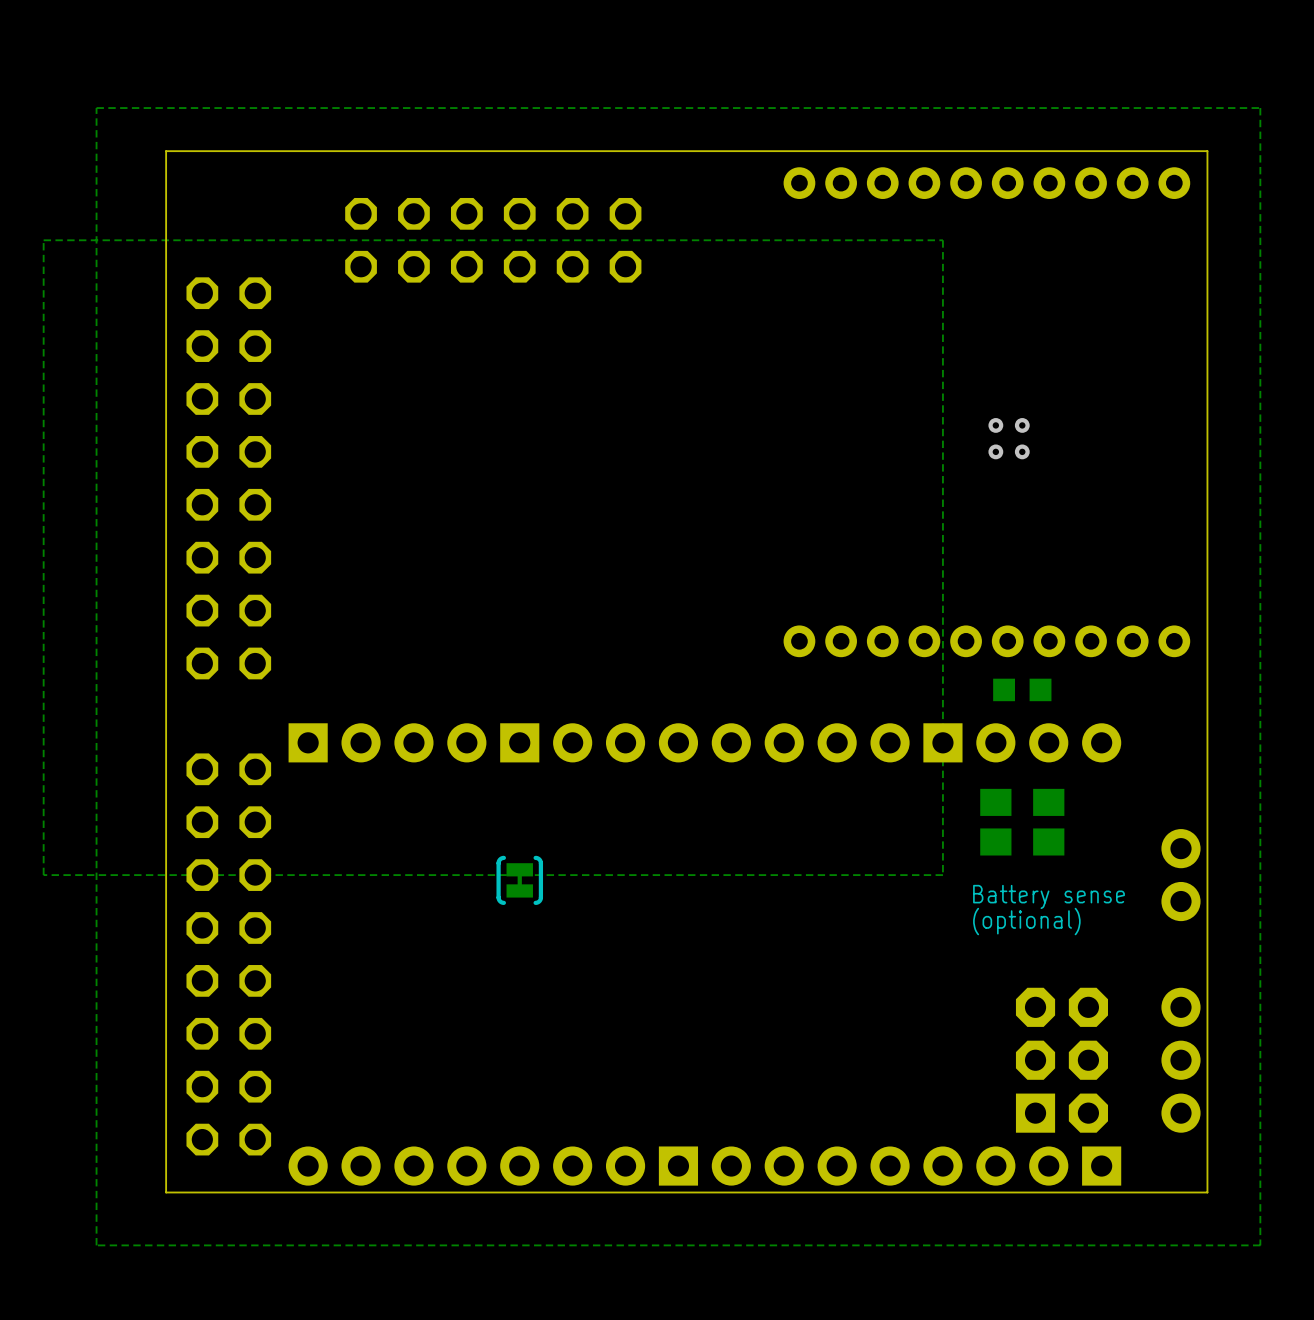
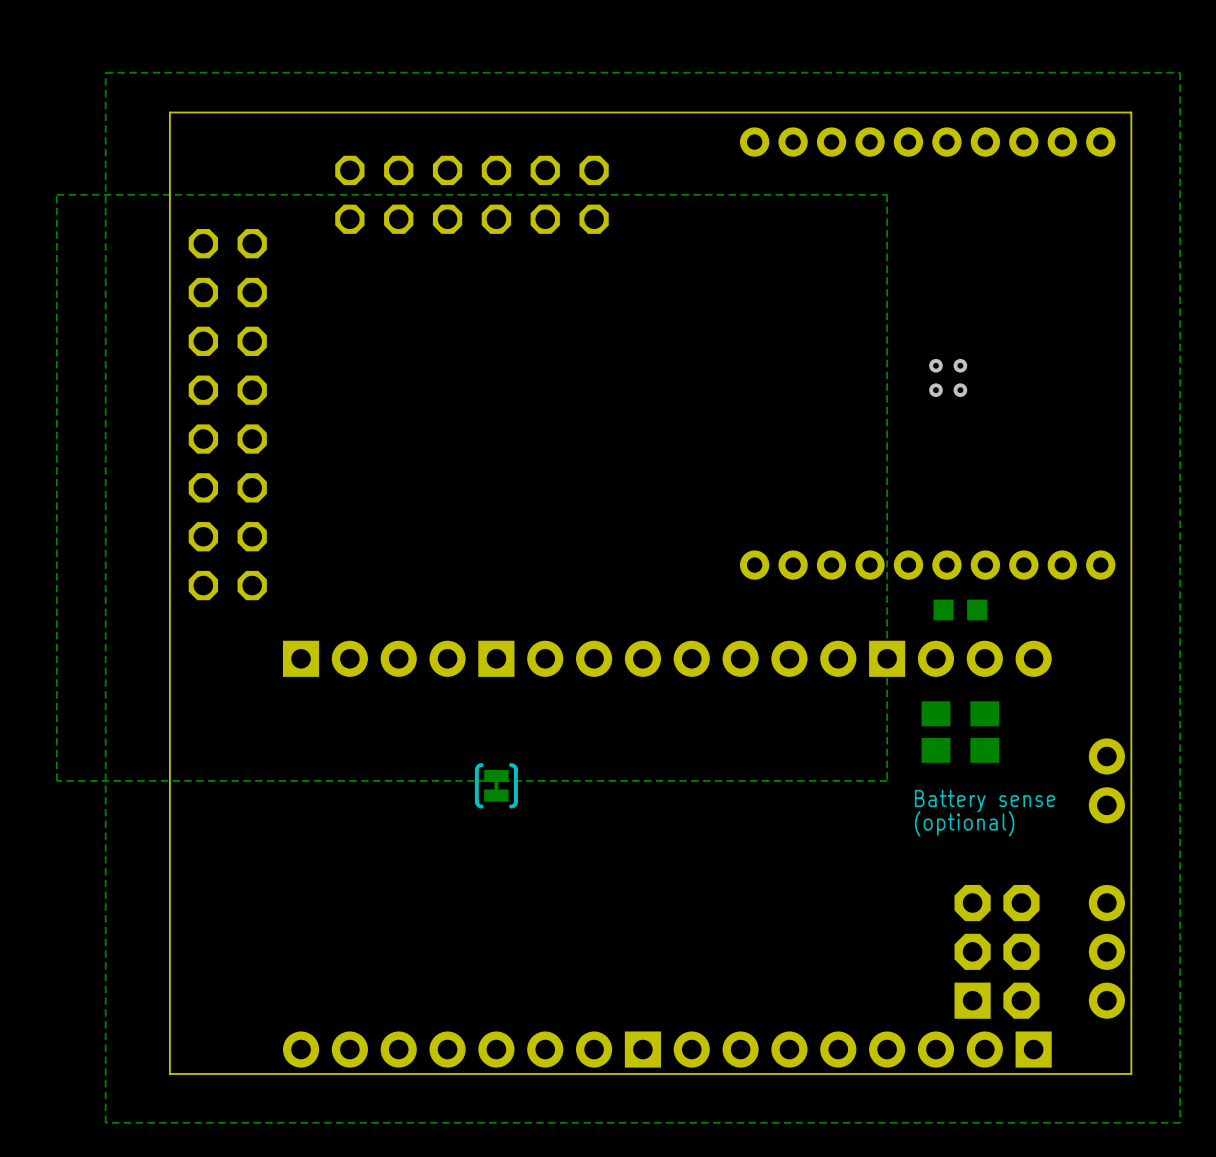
part: (228, 954) -> none

